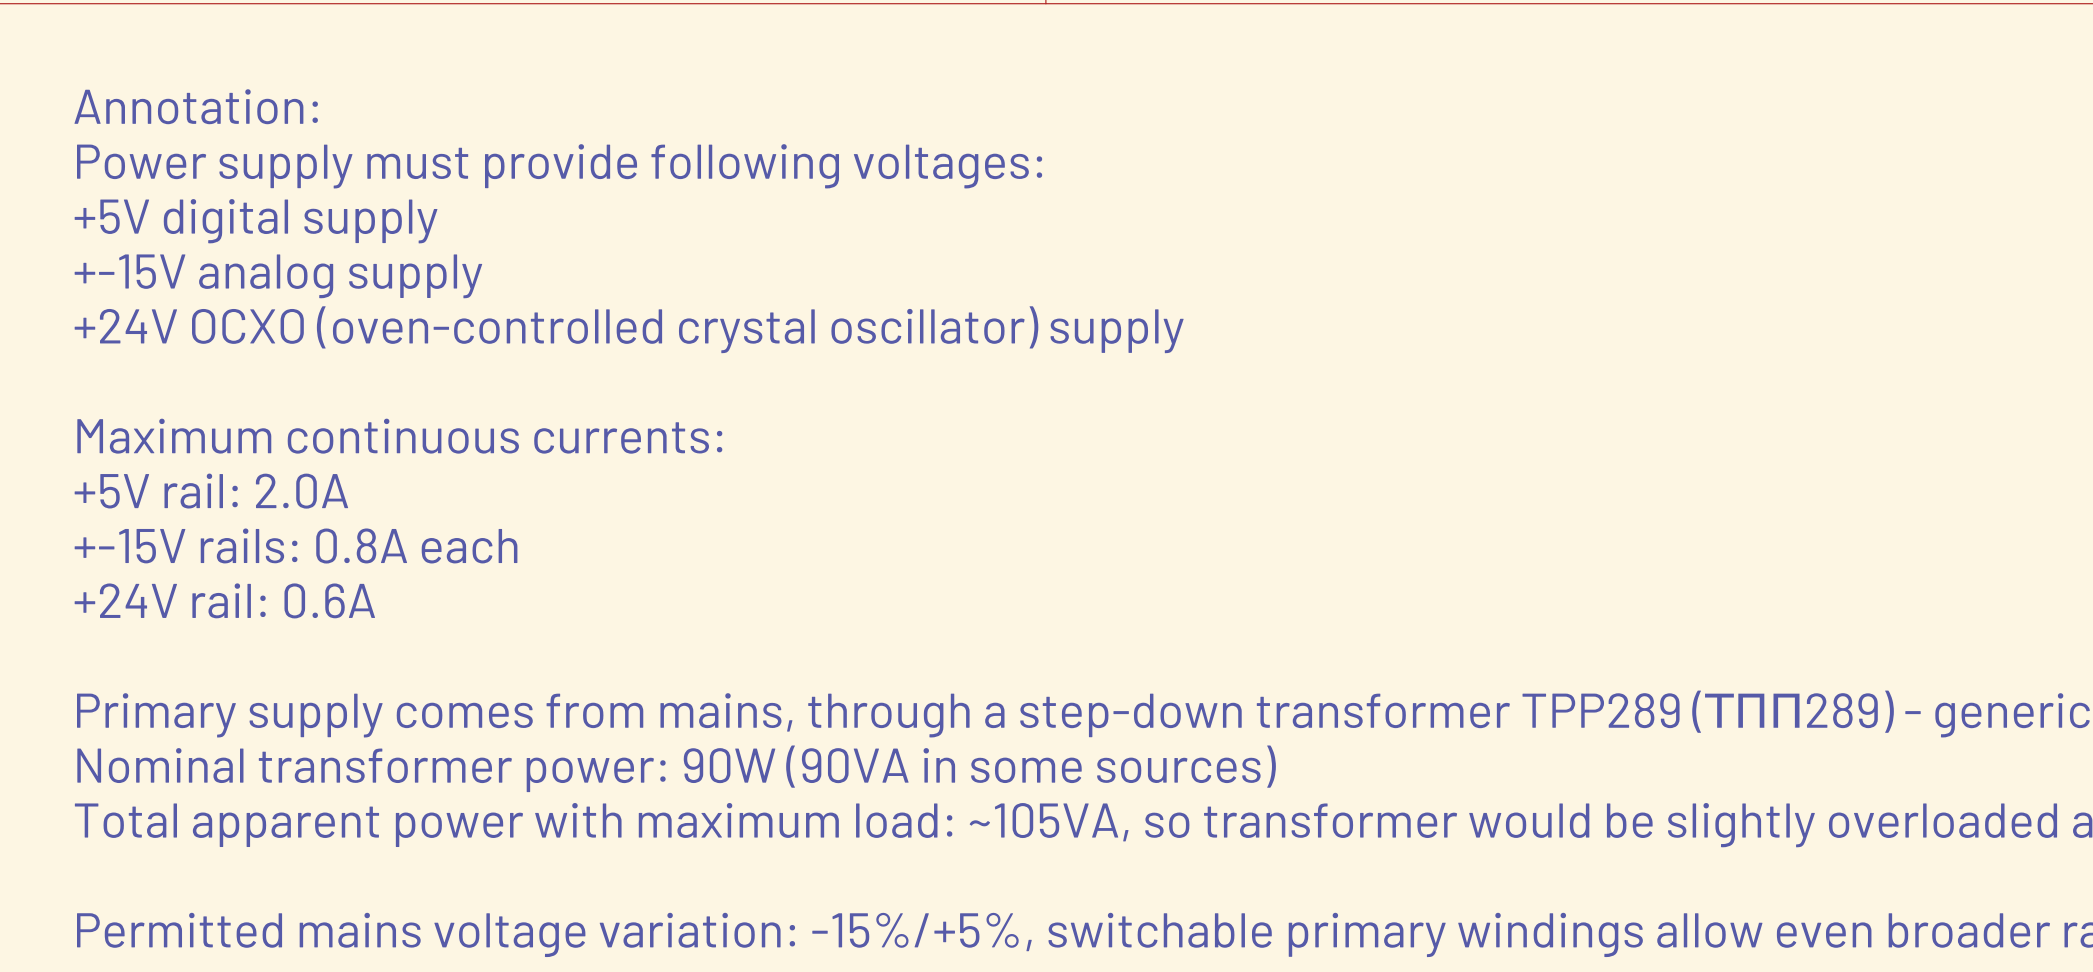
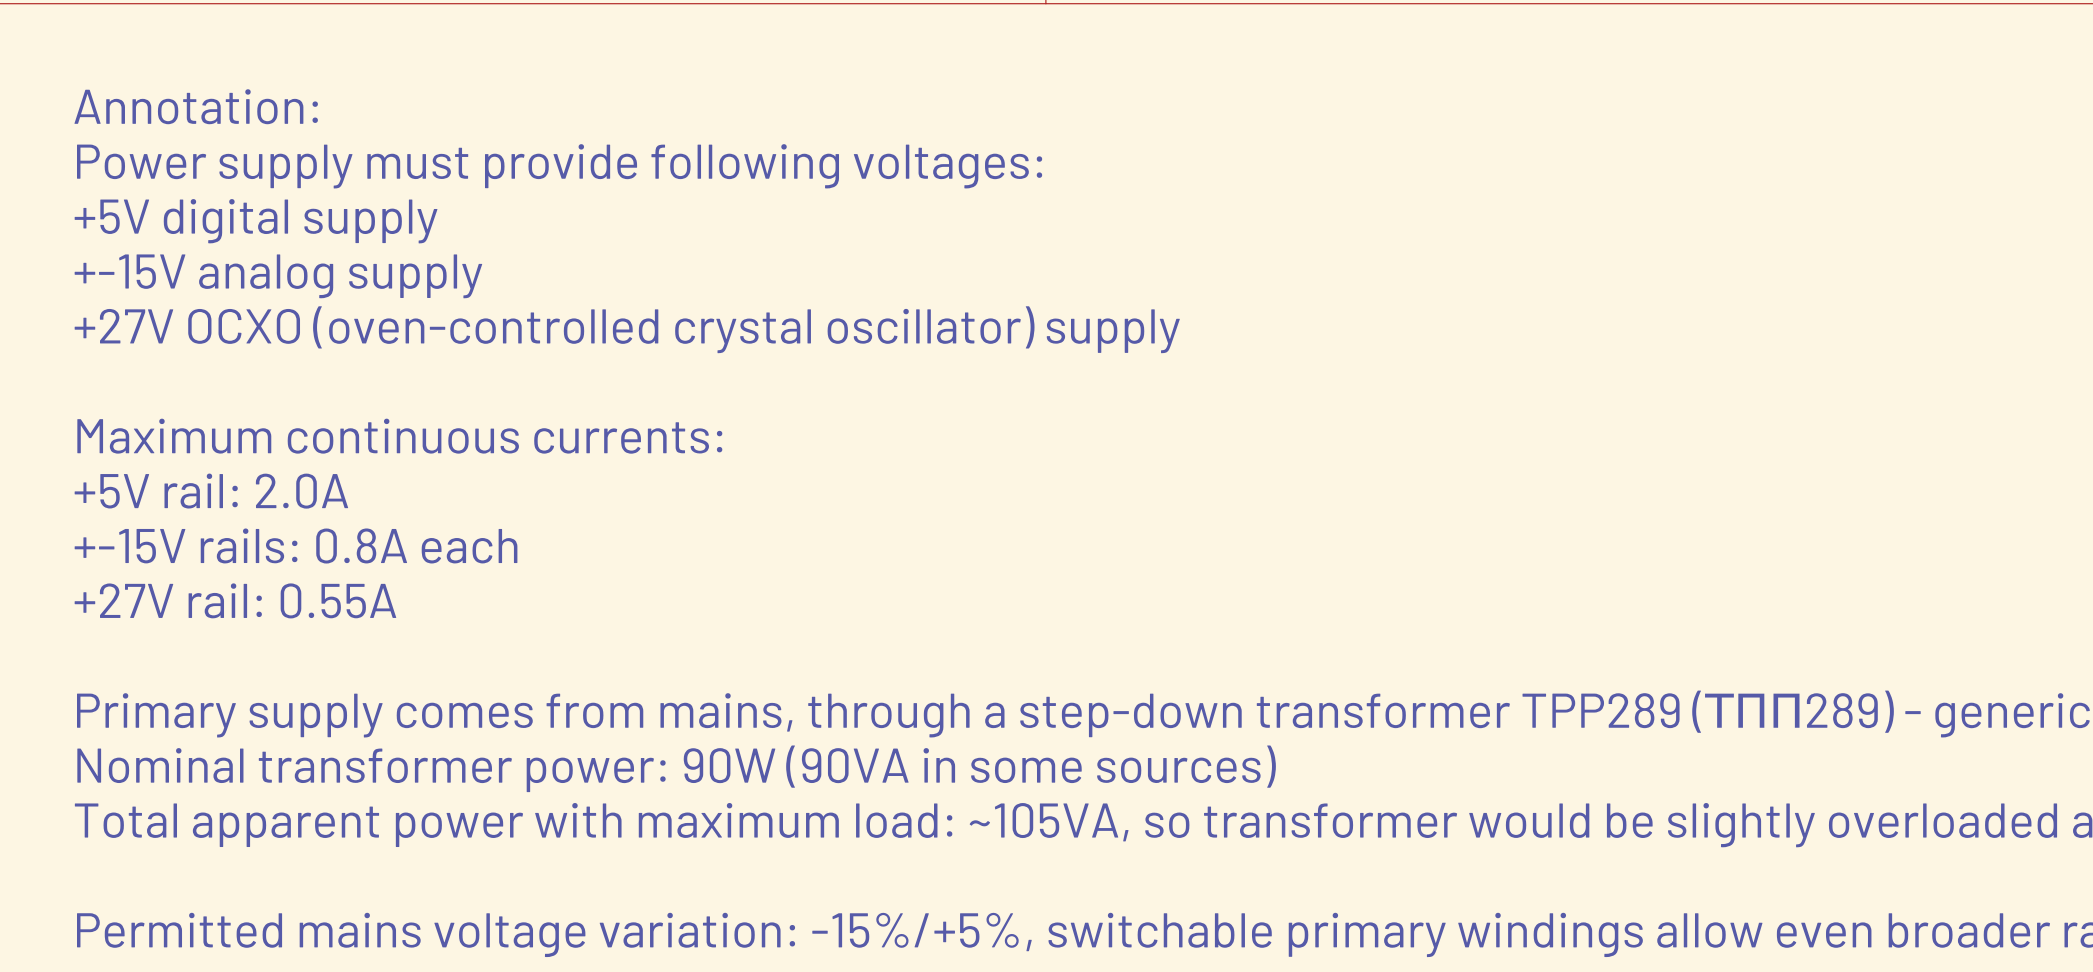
text: +24V OCXO (oven-controlled crystal oscillator) supply (629, 329) -> +27V OCXO (oven-controlled crystal oscillator) supply (627, 329)
text: +24V rail: 0.6A (224, 600) -> +27V rail: 0.55A (235, 600)

